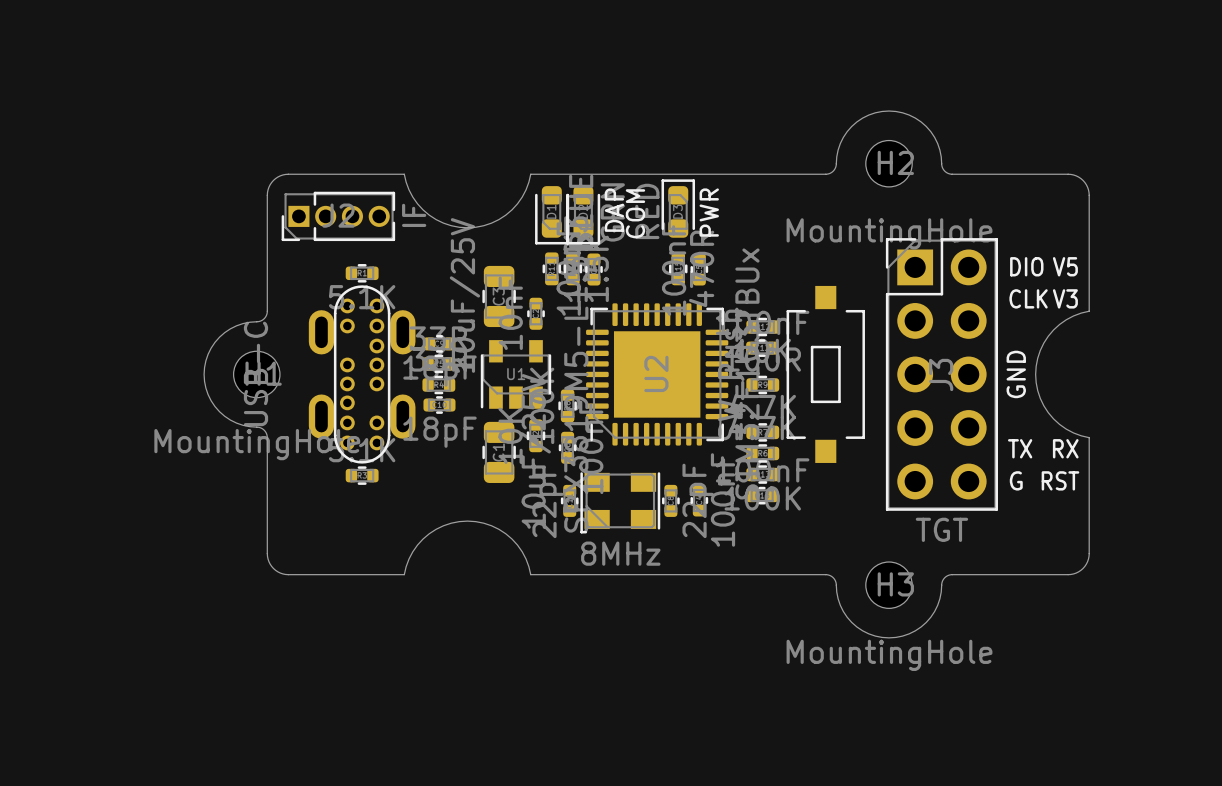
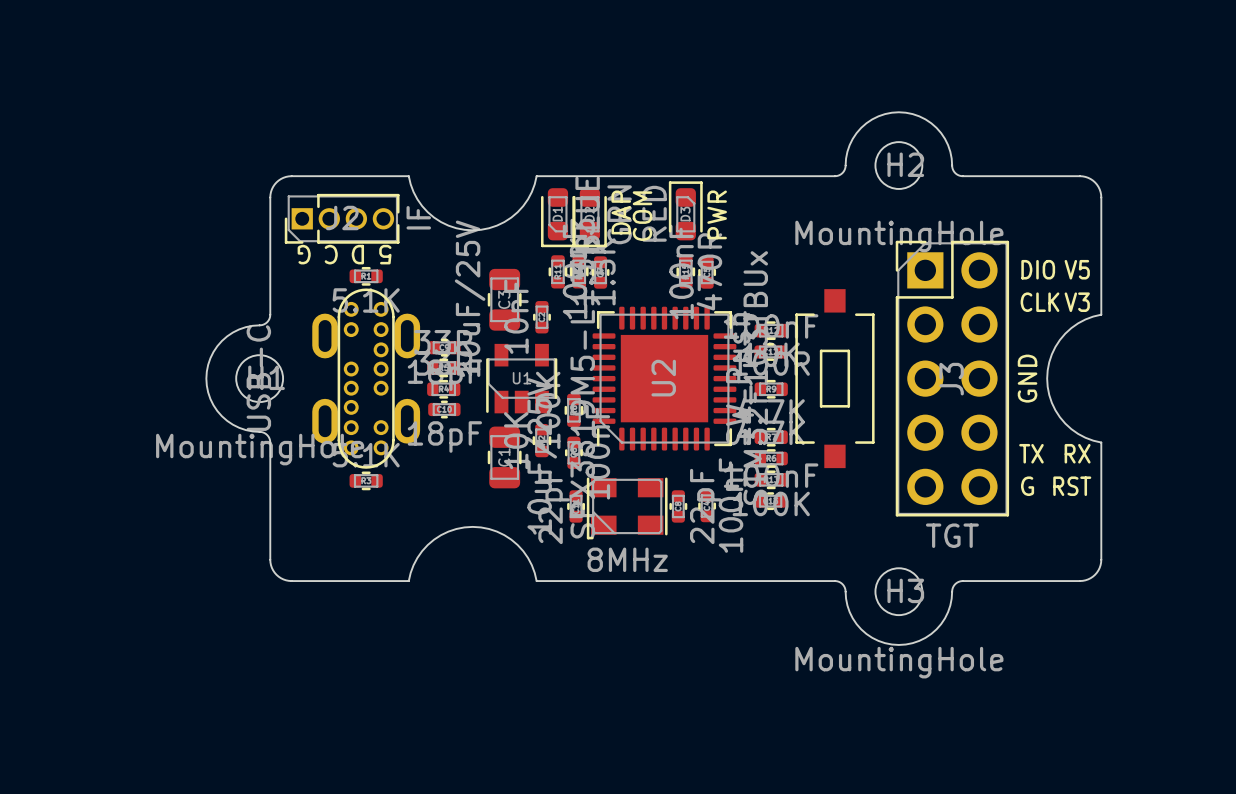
text: none -> G (304, 254)
text: none -> C (331, 254)
text: none -> D (357, 254)
text: none -> 5 (385, 254)

